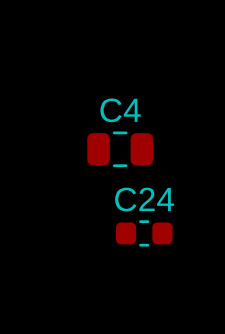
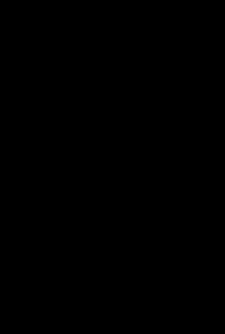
C4: (120, 149) -> none
C24: (144, 233) -> none

